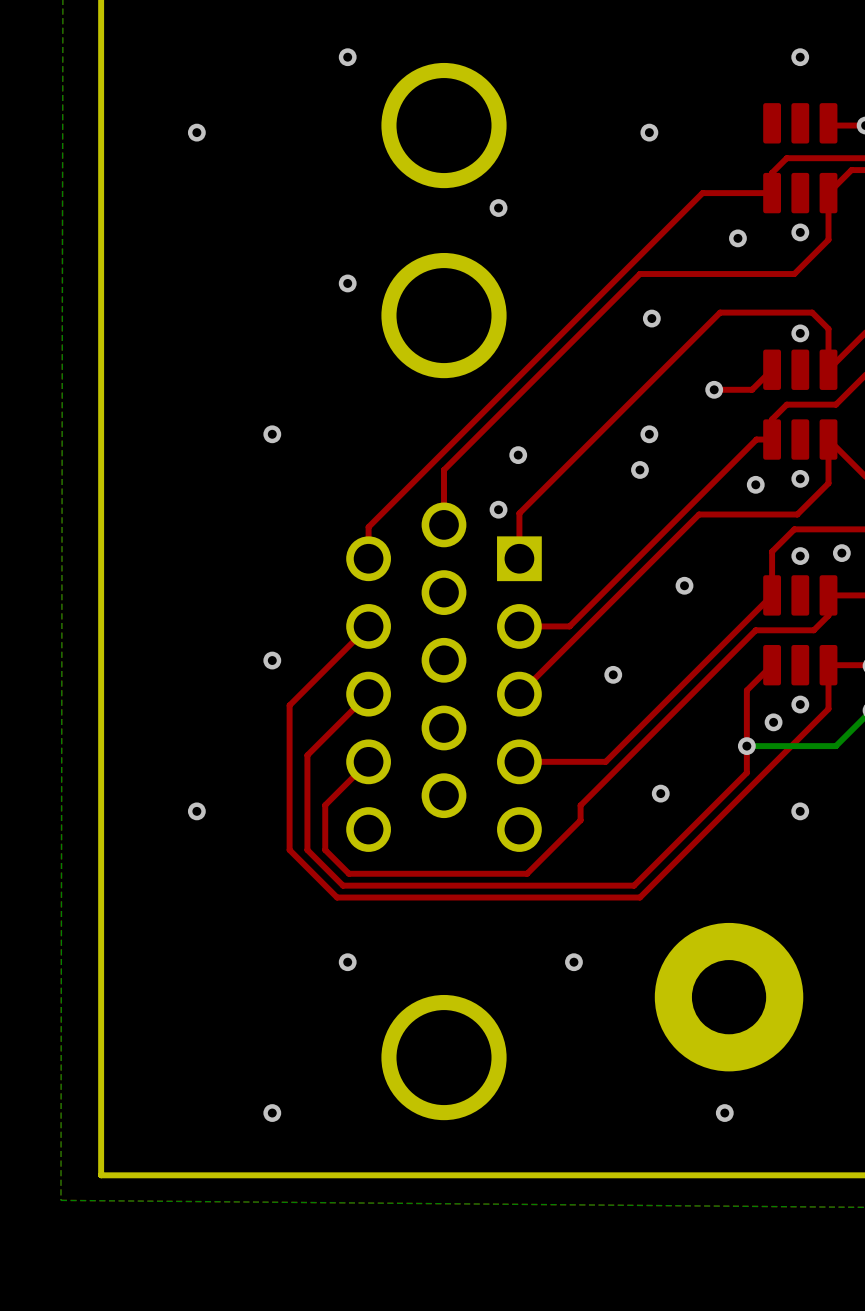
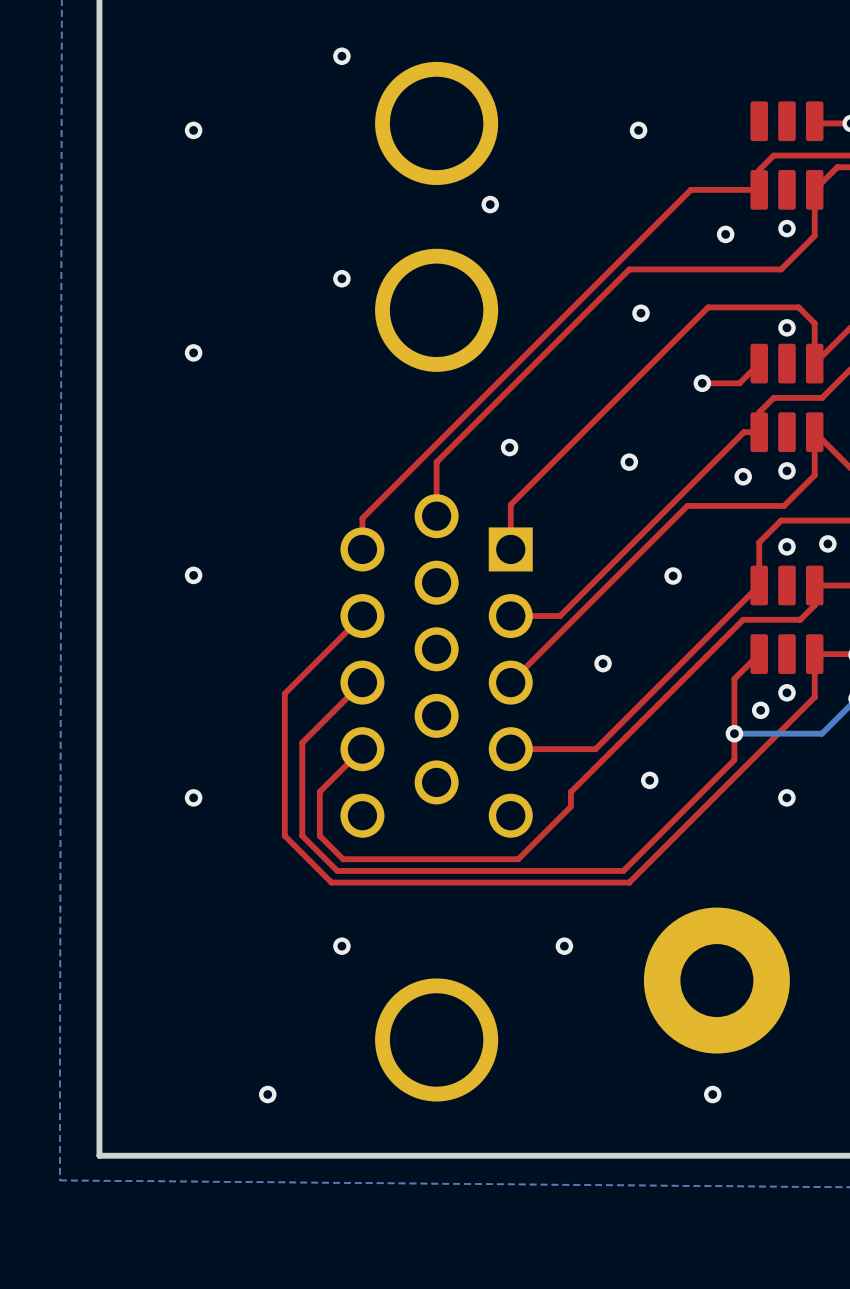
via: (800, 57) -> none
via: none -> (193, 352)
via: (272, 434) -> none
via: (649, 434) -> none
via: (498, 509) -> none
via: none -> (193, 575)
via: (272, 660) -> none

